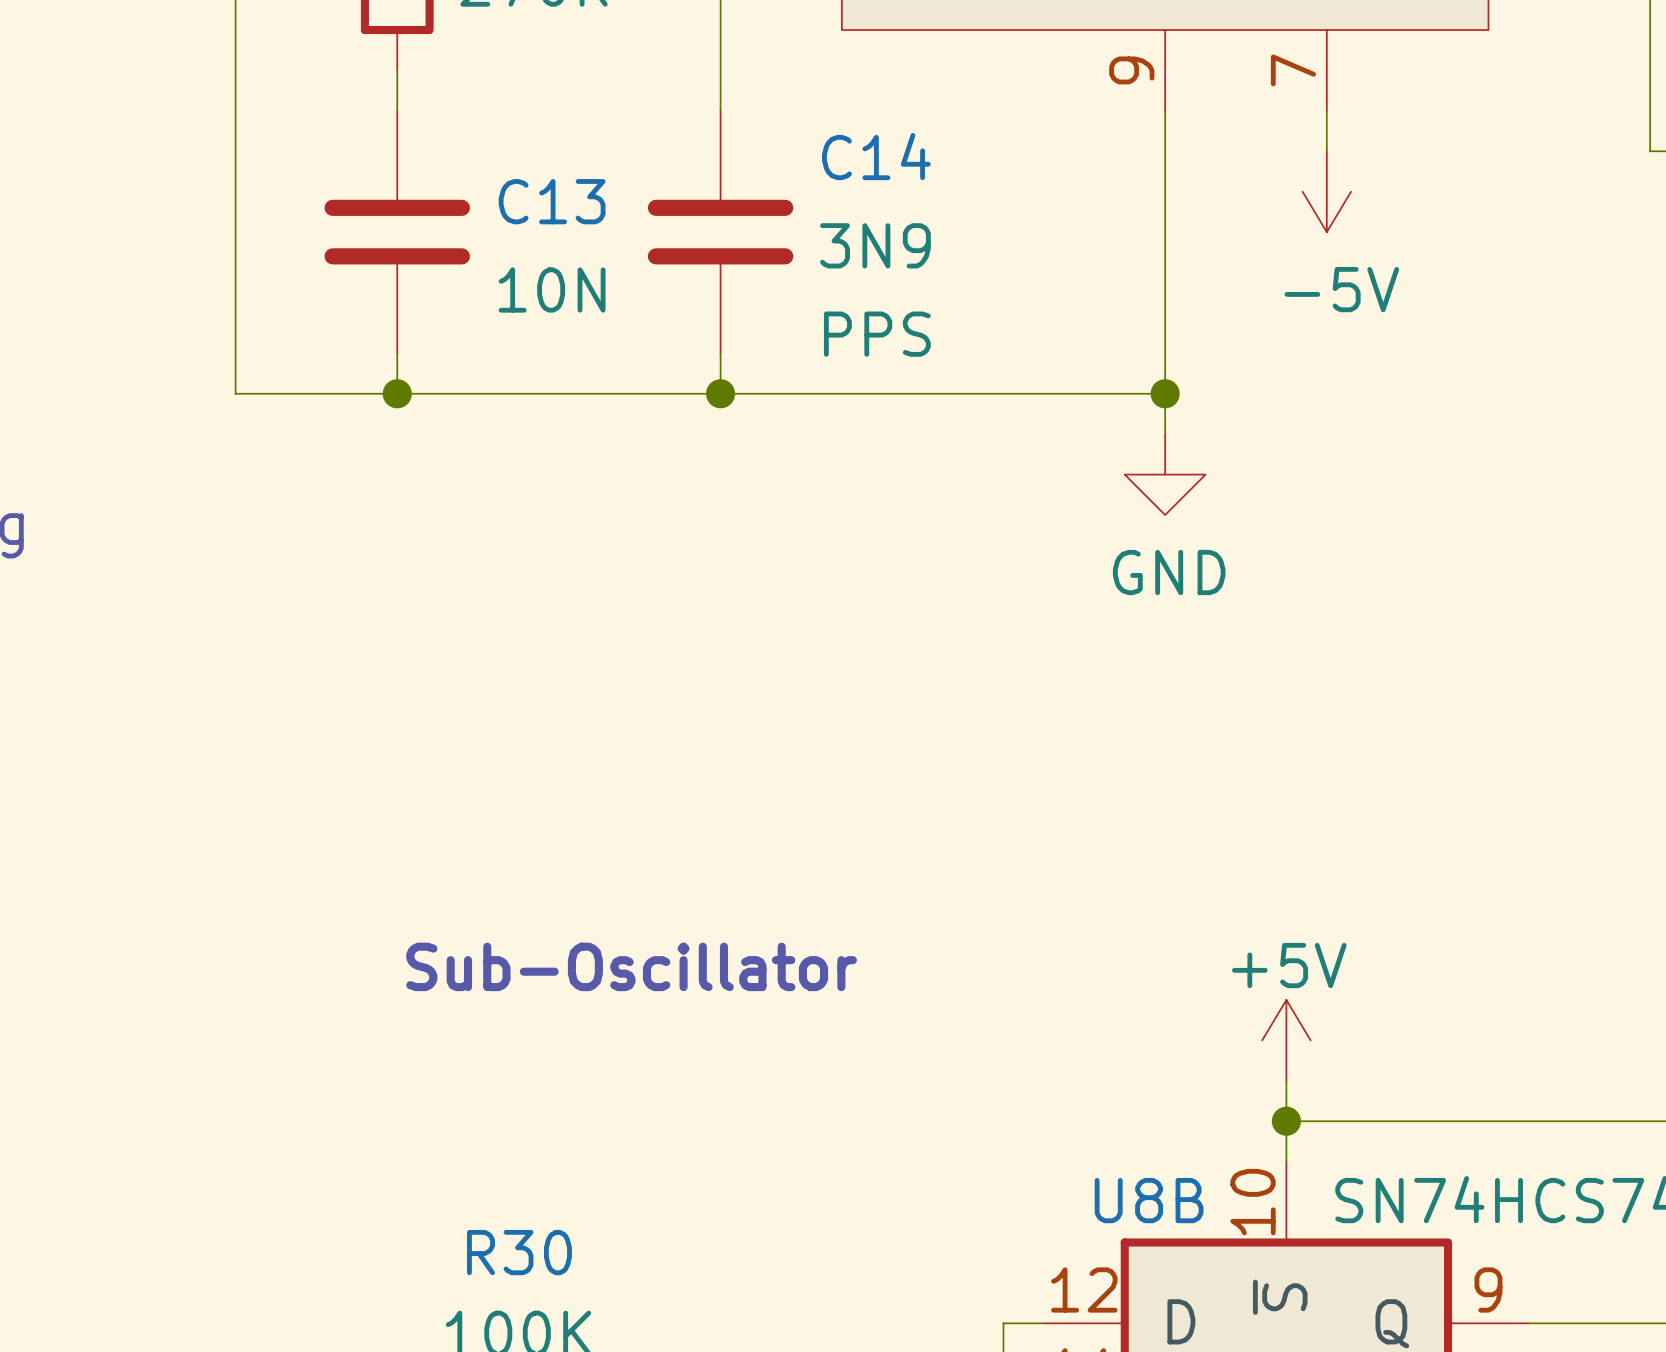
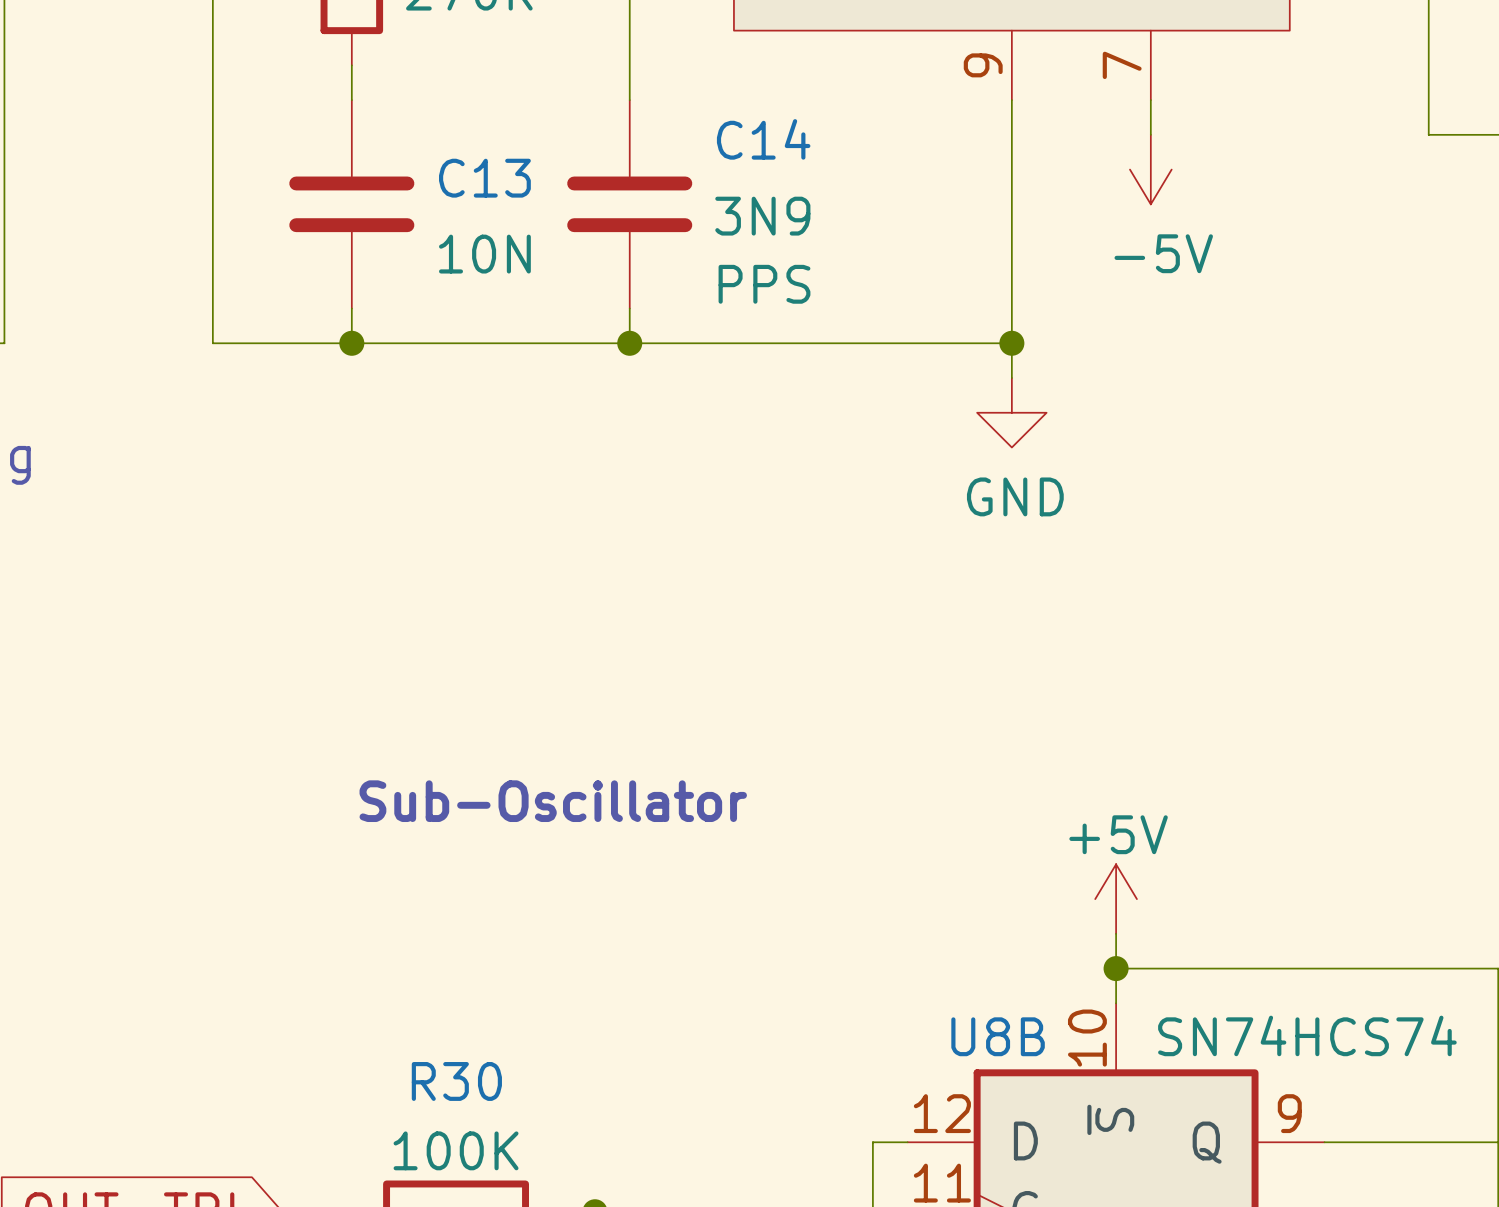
C14 text: none -> PPS (764, 284)
C14 text: PPS (877, 334) -> none
text position: Sub-Oscillator (631, 966) -> Sub-Oscillator (553, 801)

